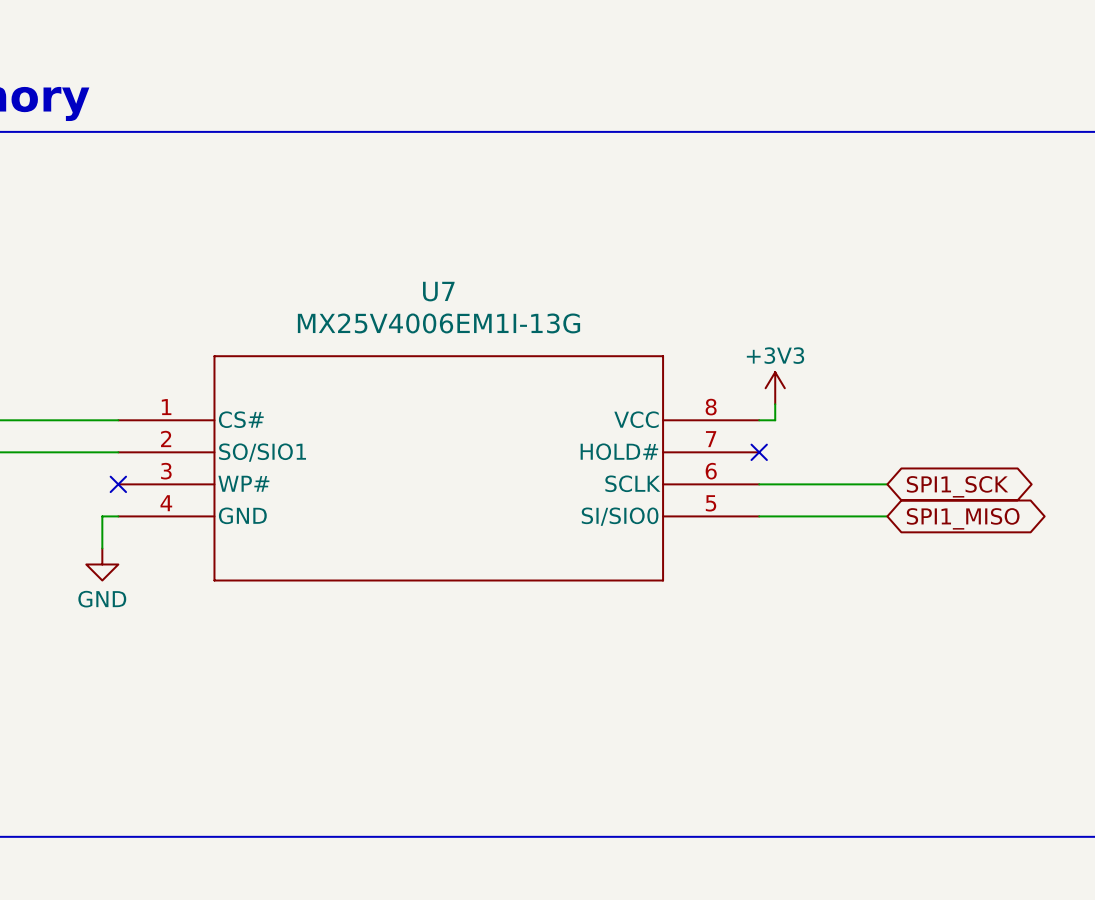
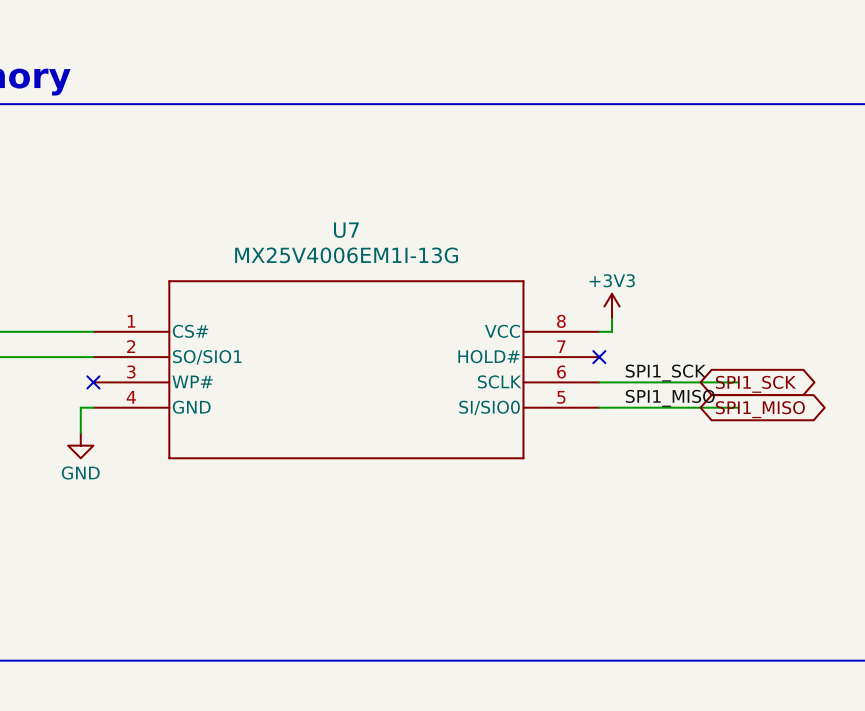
label: none -> SPI1_SCK (665, 373)
wire: none -> (700, 382) (738, 382)
label: none -> SPI1_MISO (670, 398)
wire: none -> (700, 407) (738, 407)

